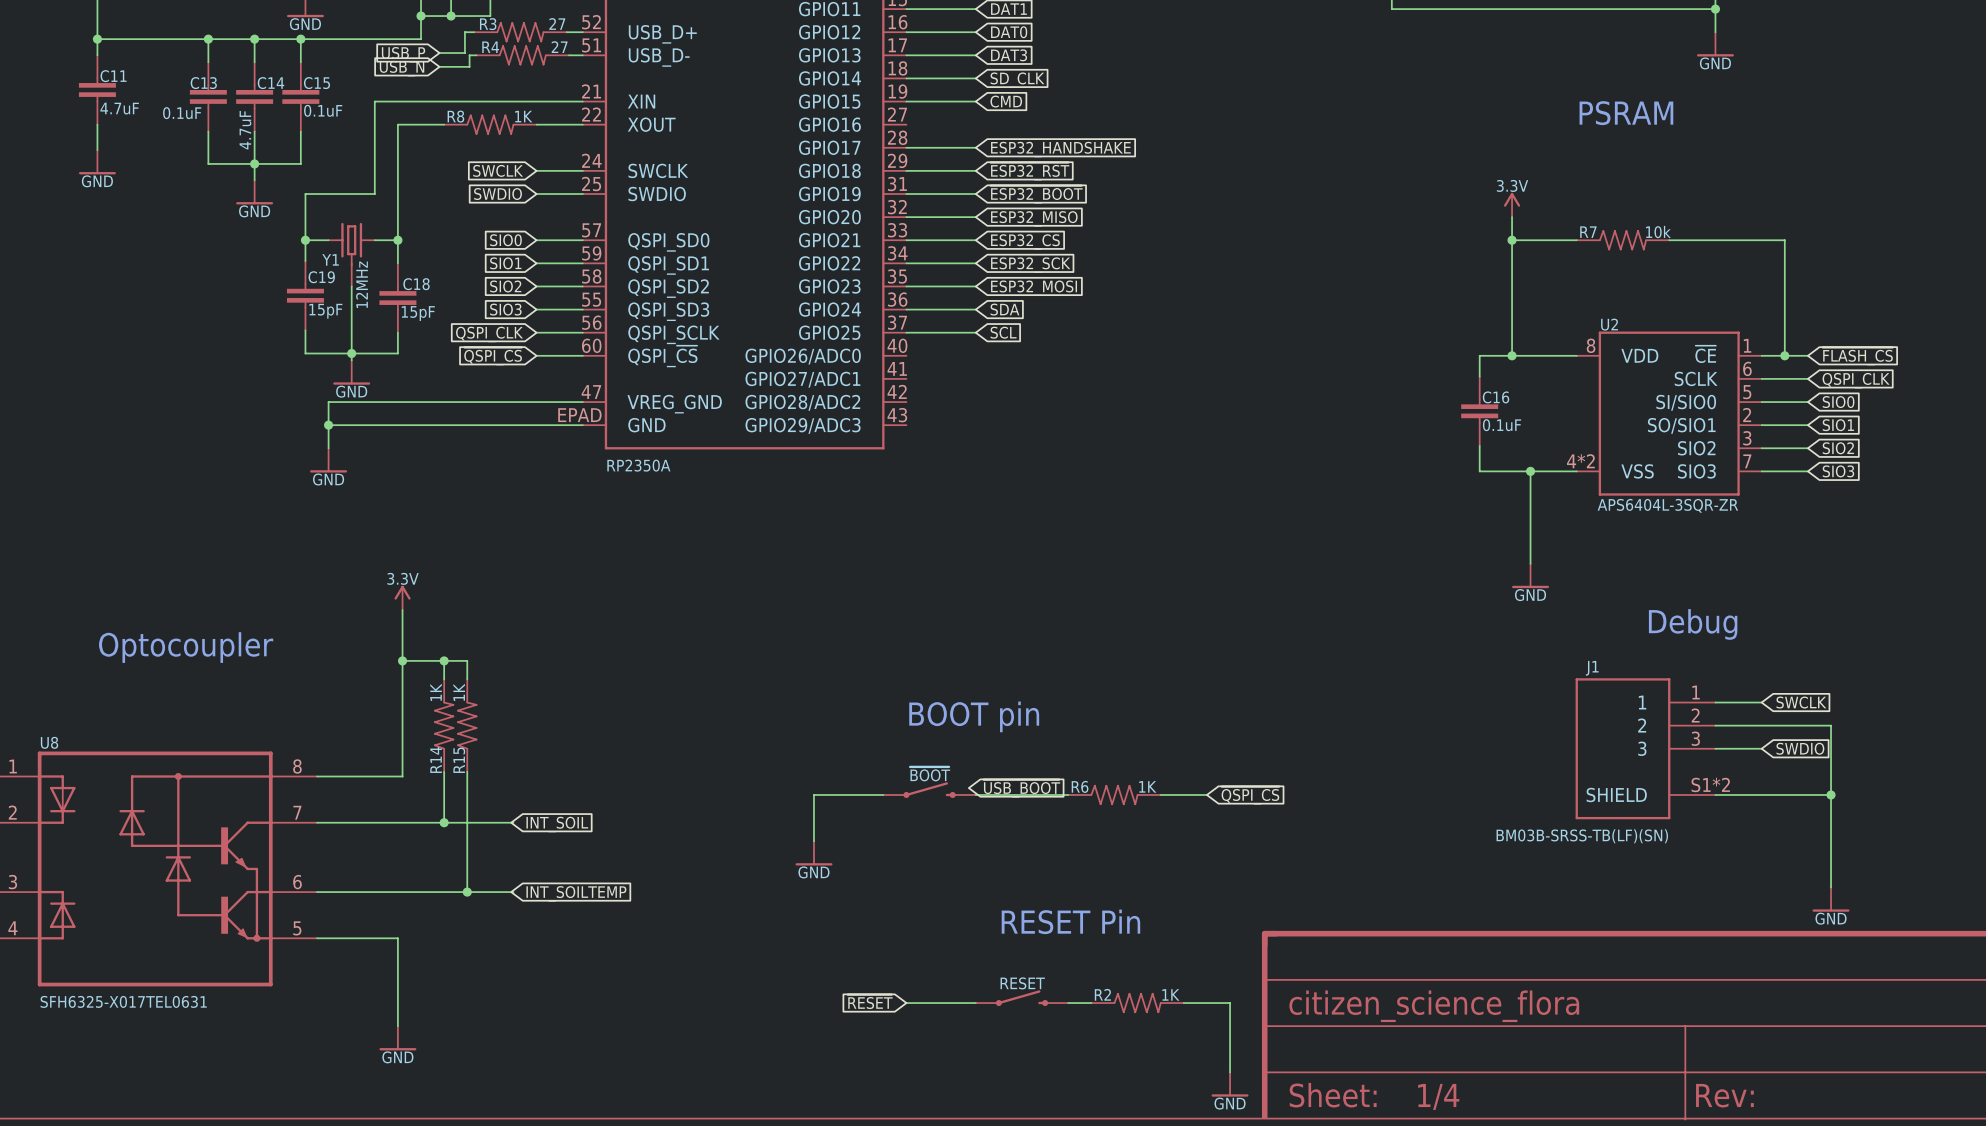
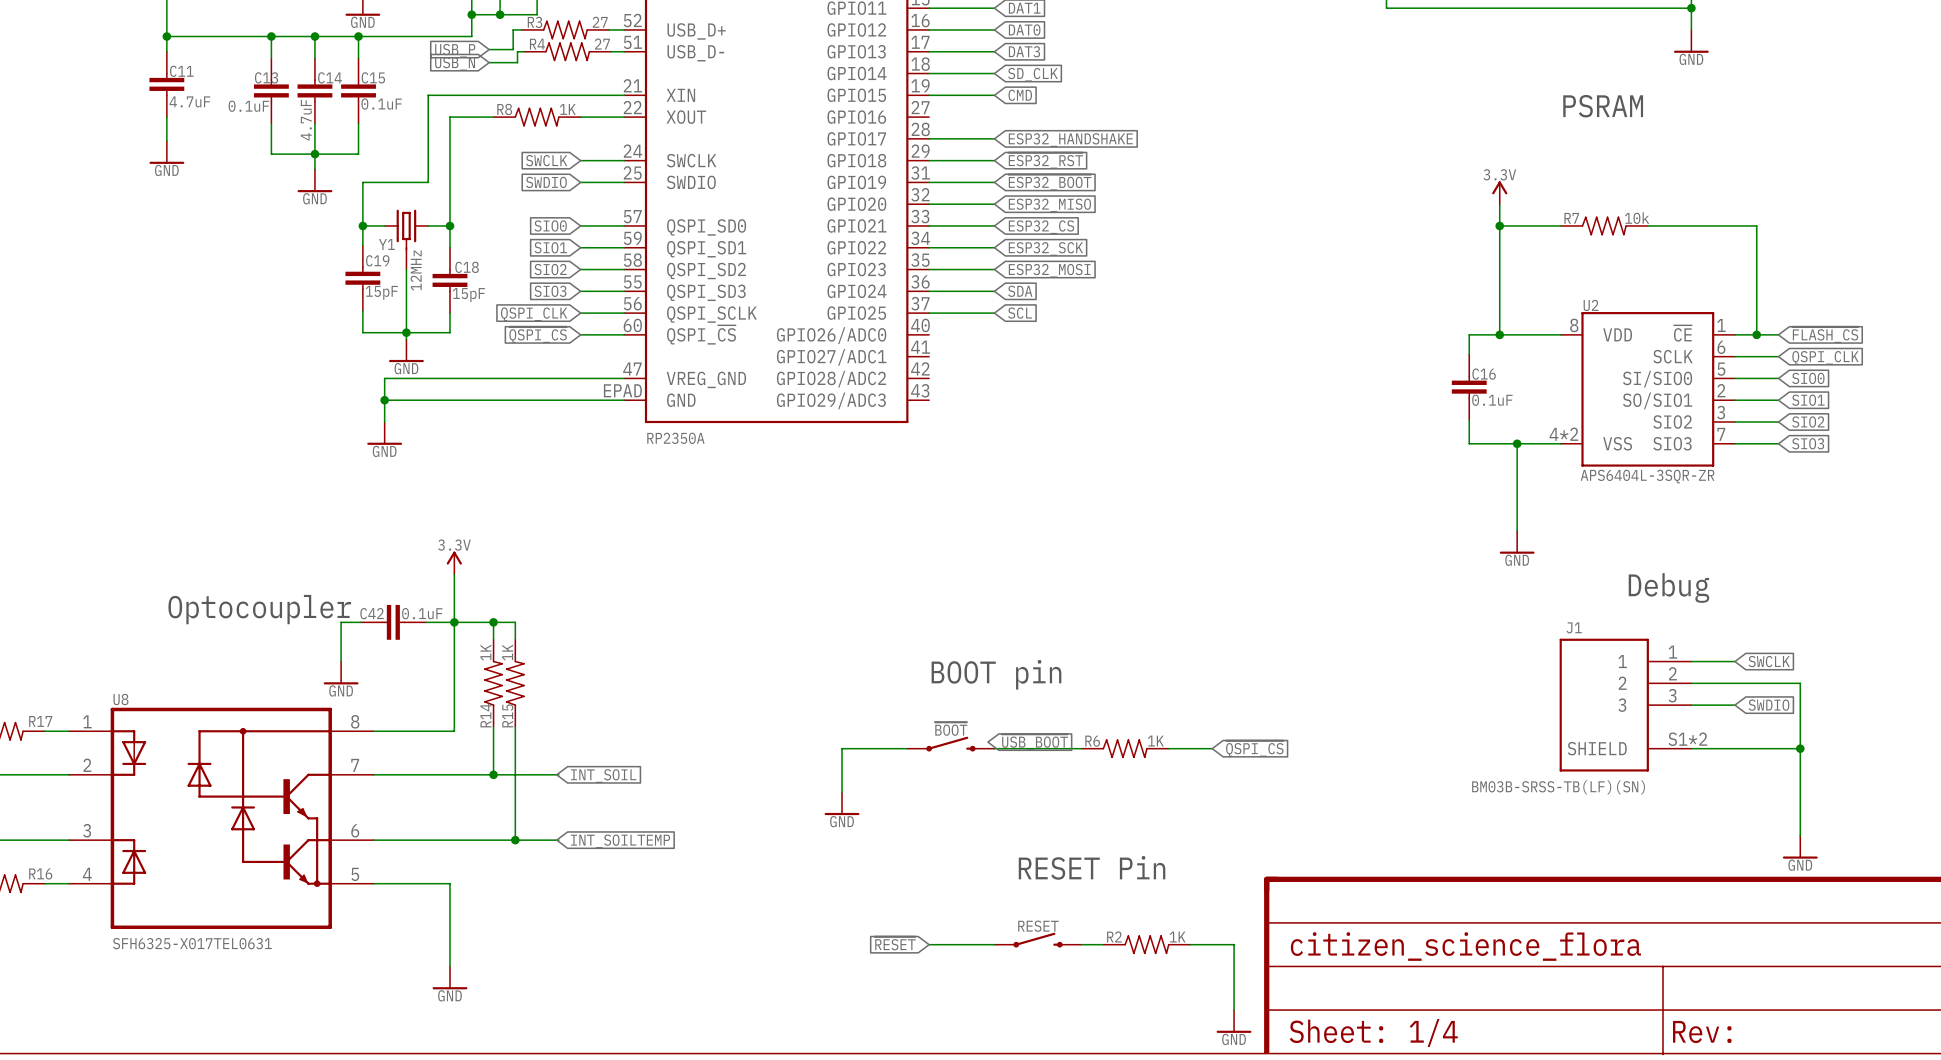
wire: none -> (360, 622) (341, 622) (341, 661)
C42: none -> 0.1uF (393, 622)
wire: none -> (426, 622) (454, 622)
power symbol: none -> GND (341, 672)

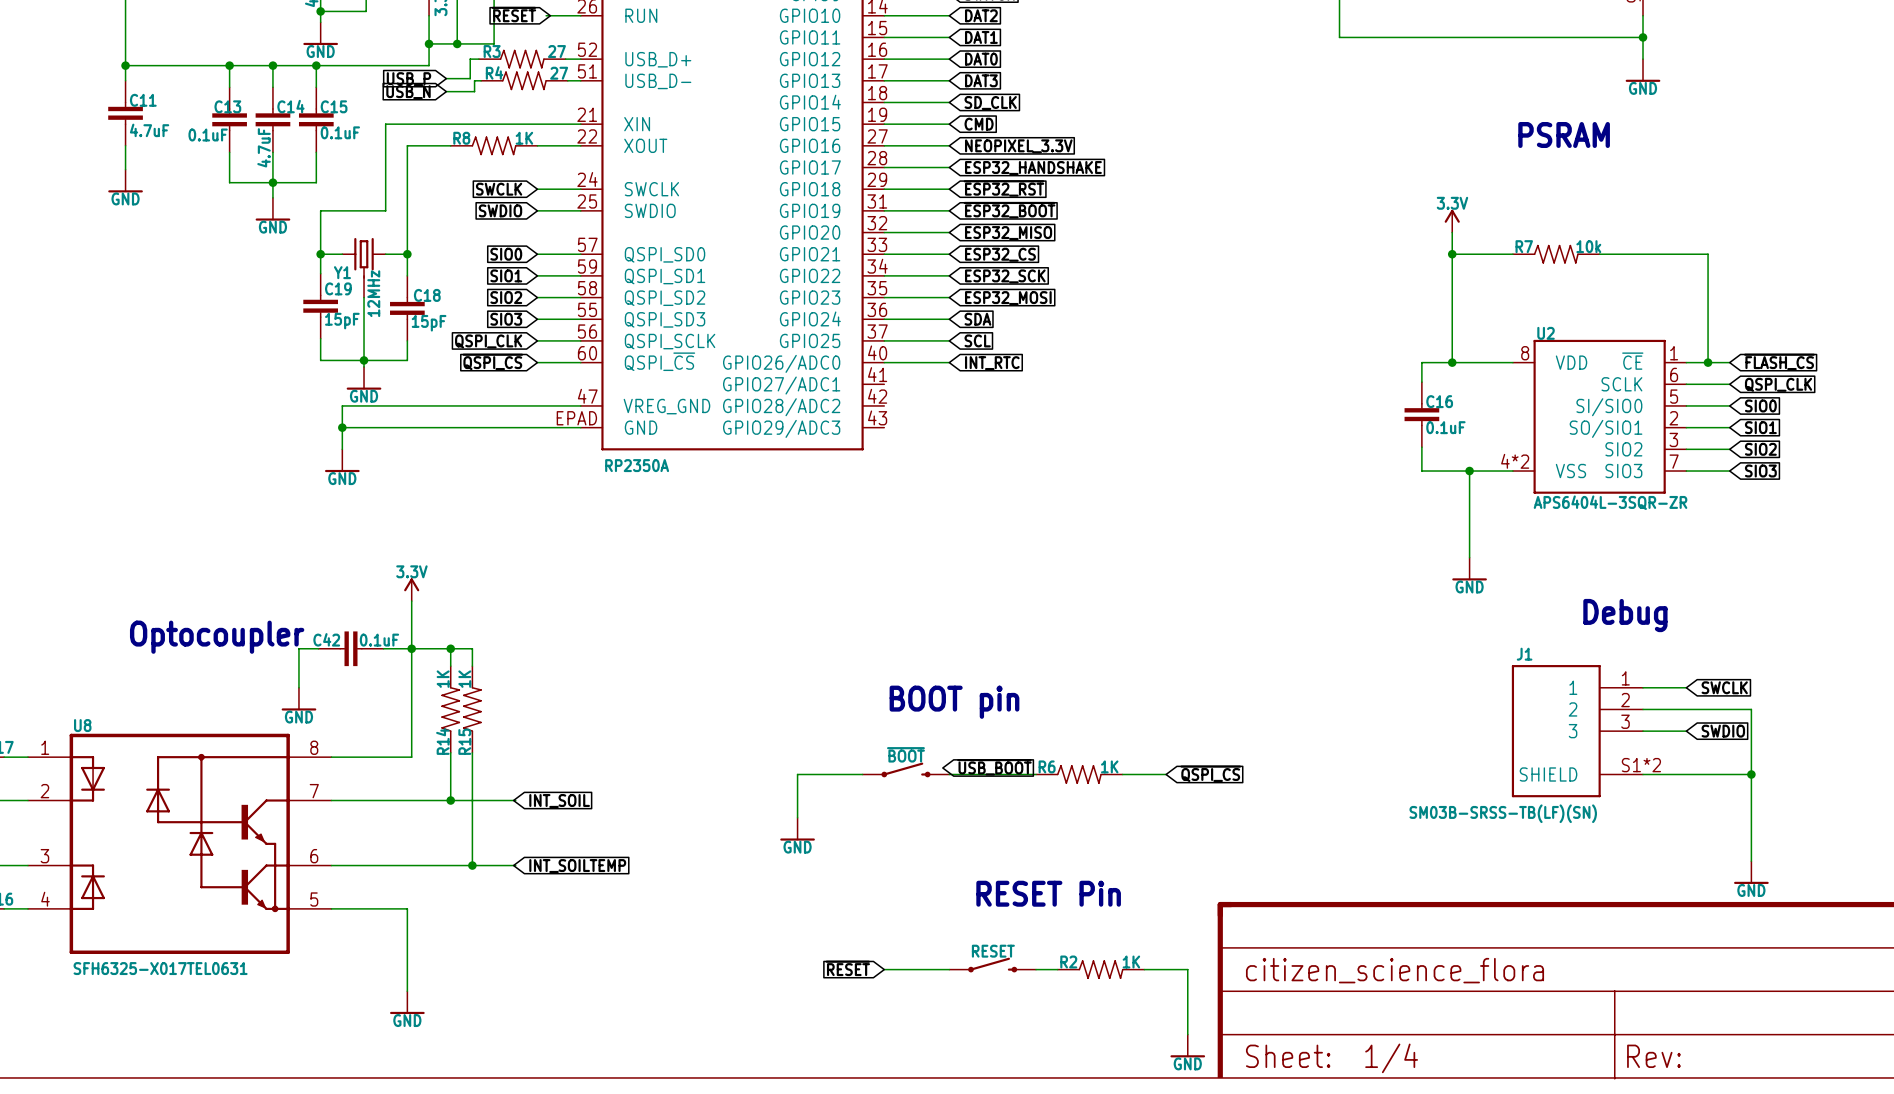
wire: none -> (884, 145) (949, 145)
global label: none -> NEOPIXEL_3.3V (1018, 146)
wire: none -> (884, 362) (949, 362)
global label: none -> INT_RTC (992, 363)
J1 value: BM03B-SRSS-TB(LF)(SN) (1558, 787) -> SM03B-SRSS-TB(LF)(SN) (1503, 813)

